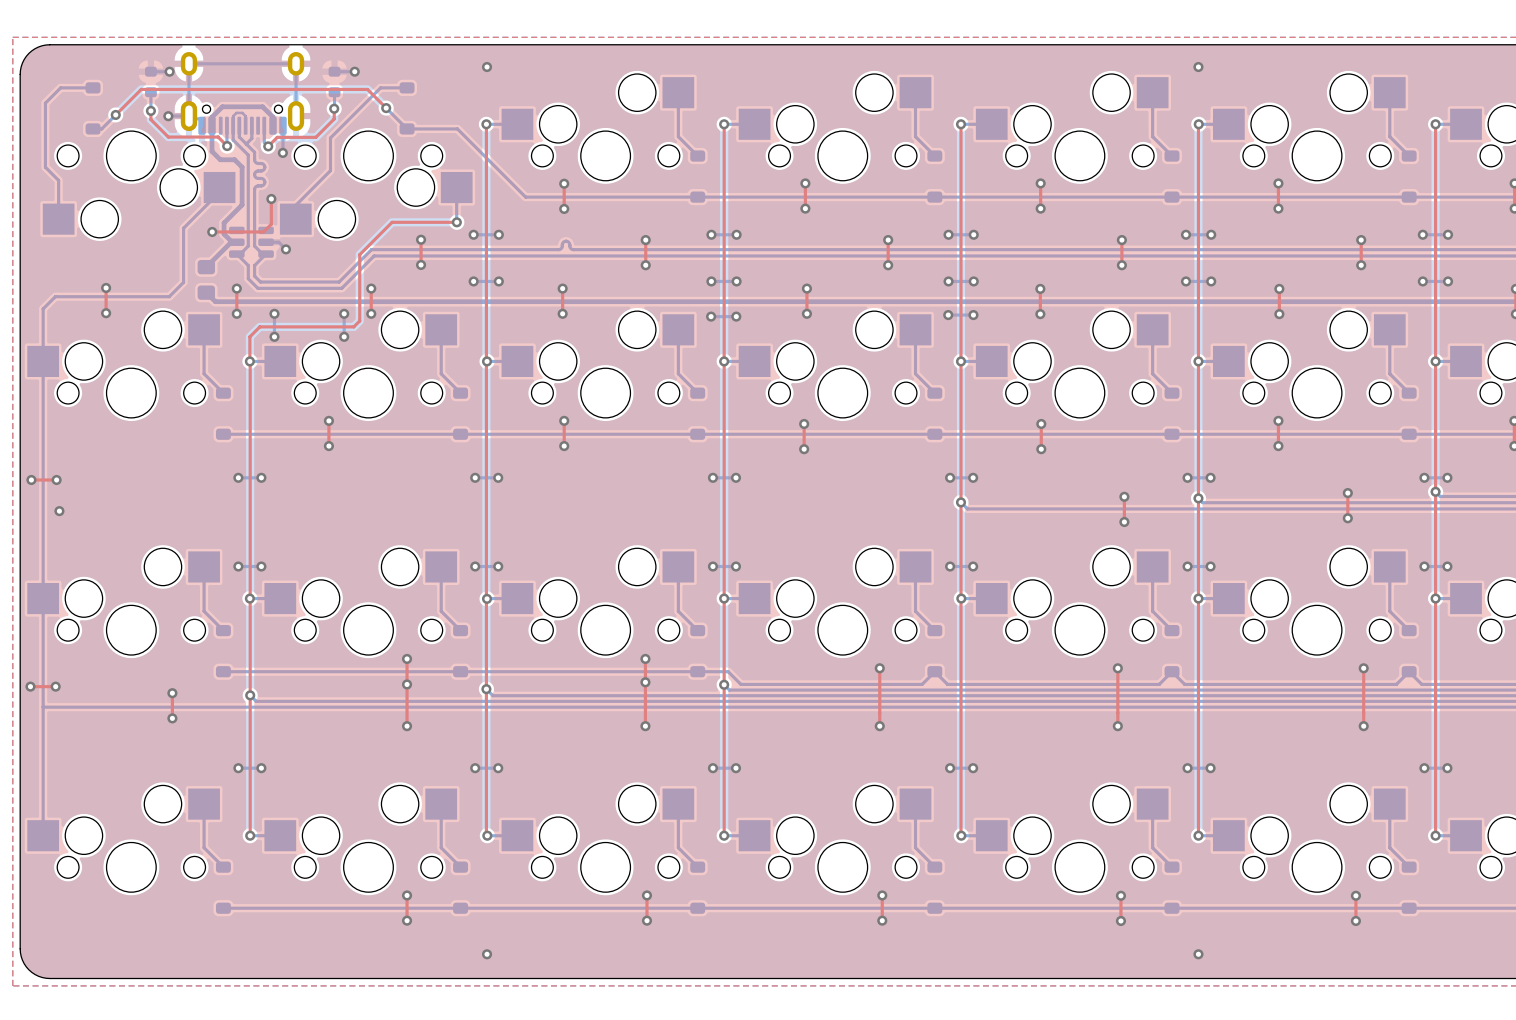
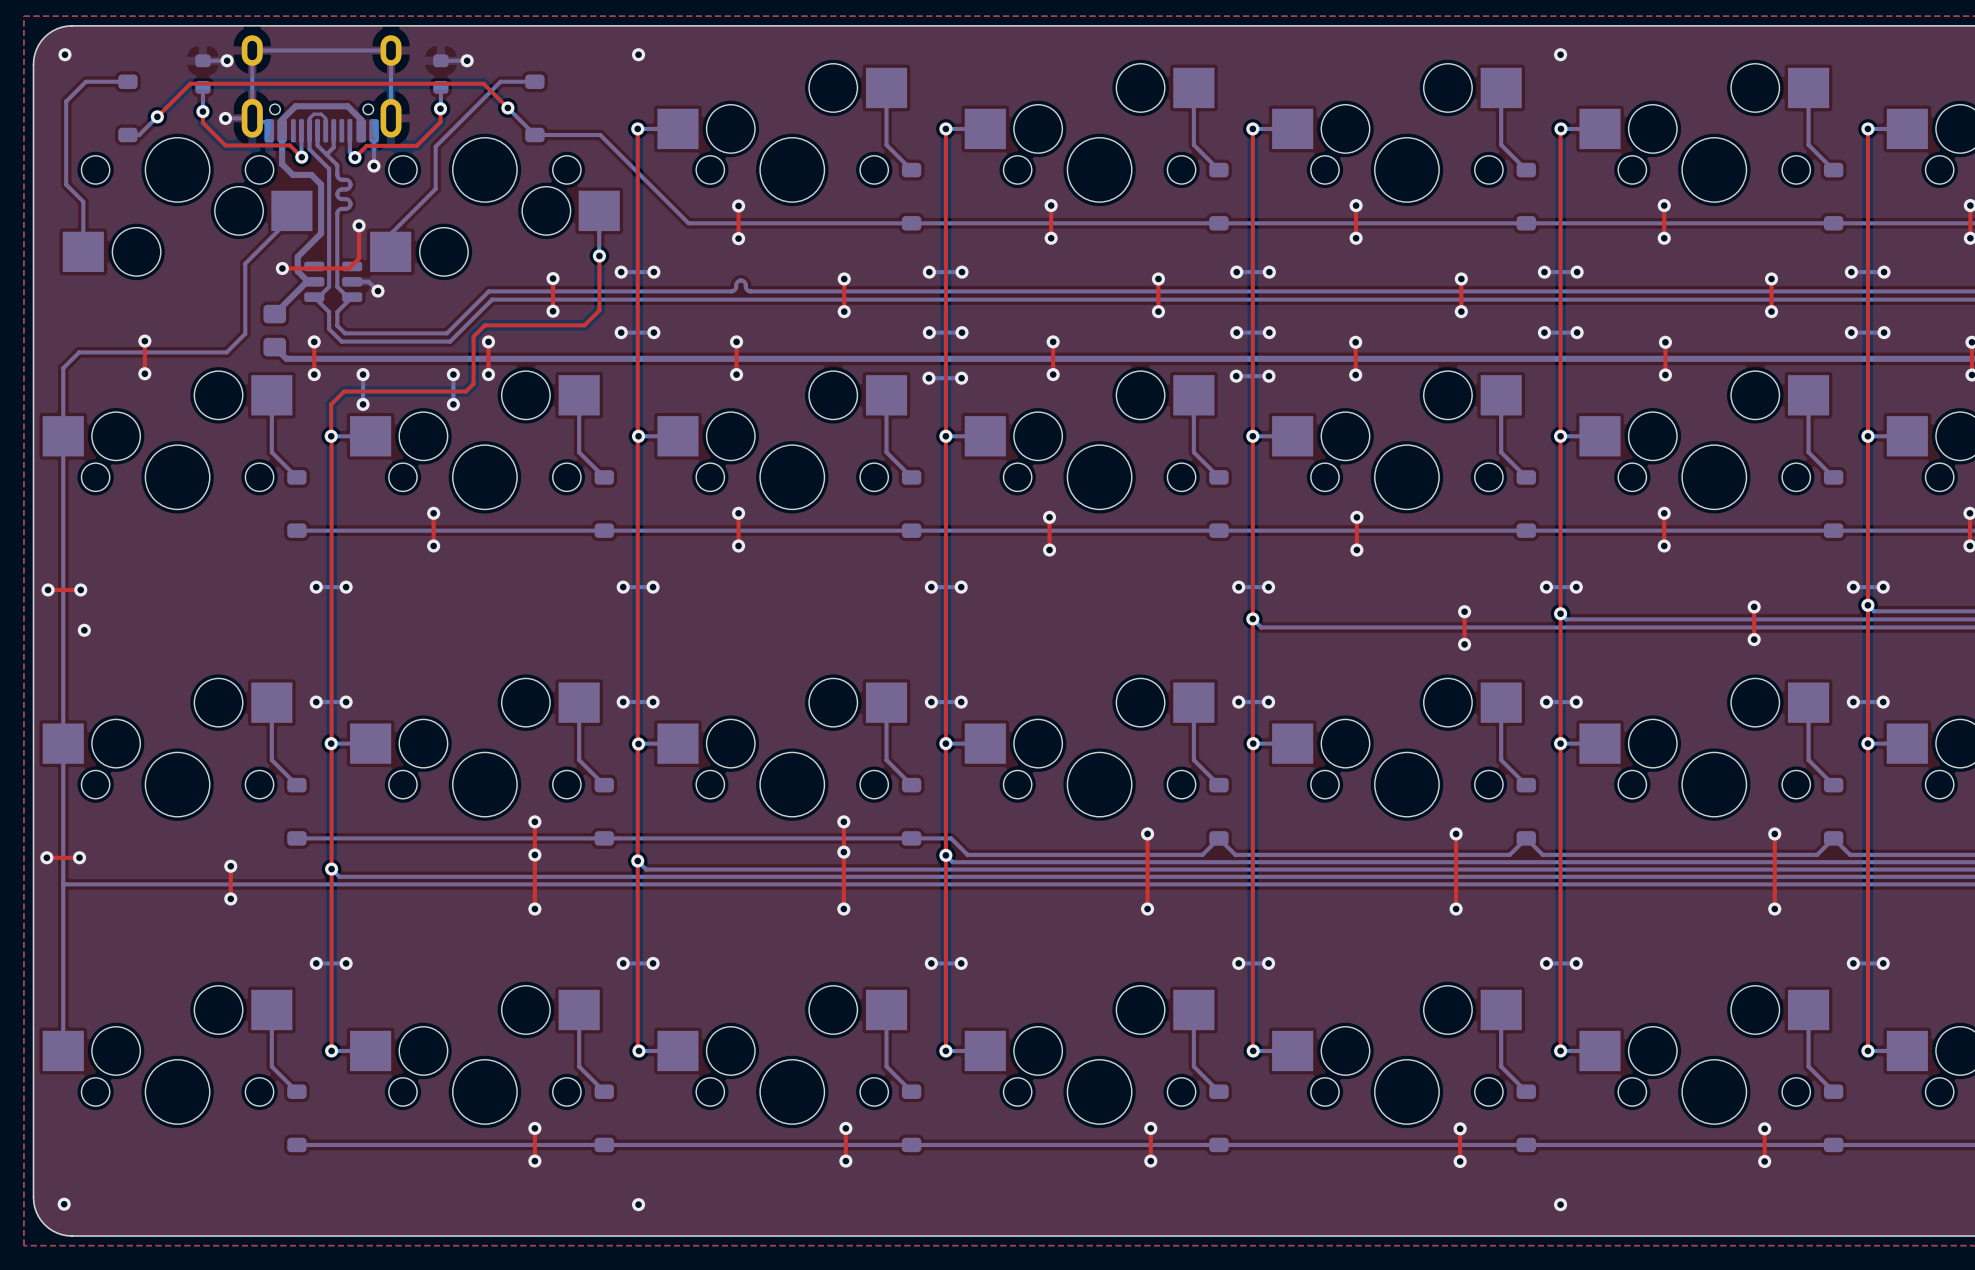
via: none -> (64, 54)
top track: (456, 222) (392, 222) (359, 254) (359, 284) -> (599, 255) (599, 310) (584, 325) (484, 325) (473, 336)
via: none -> (64, 1204)

